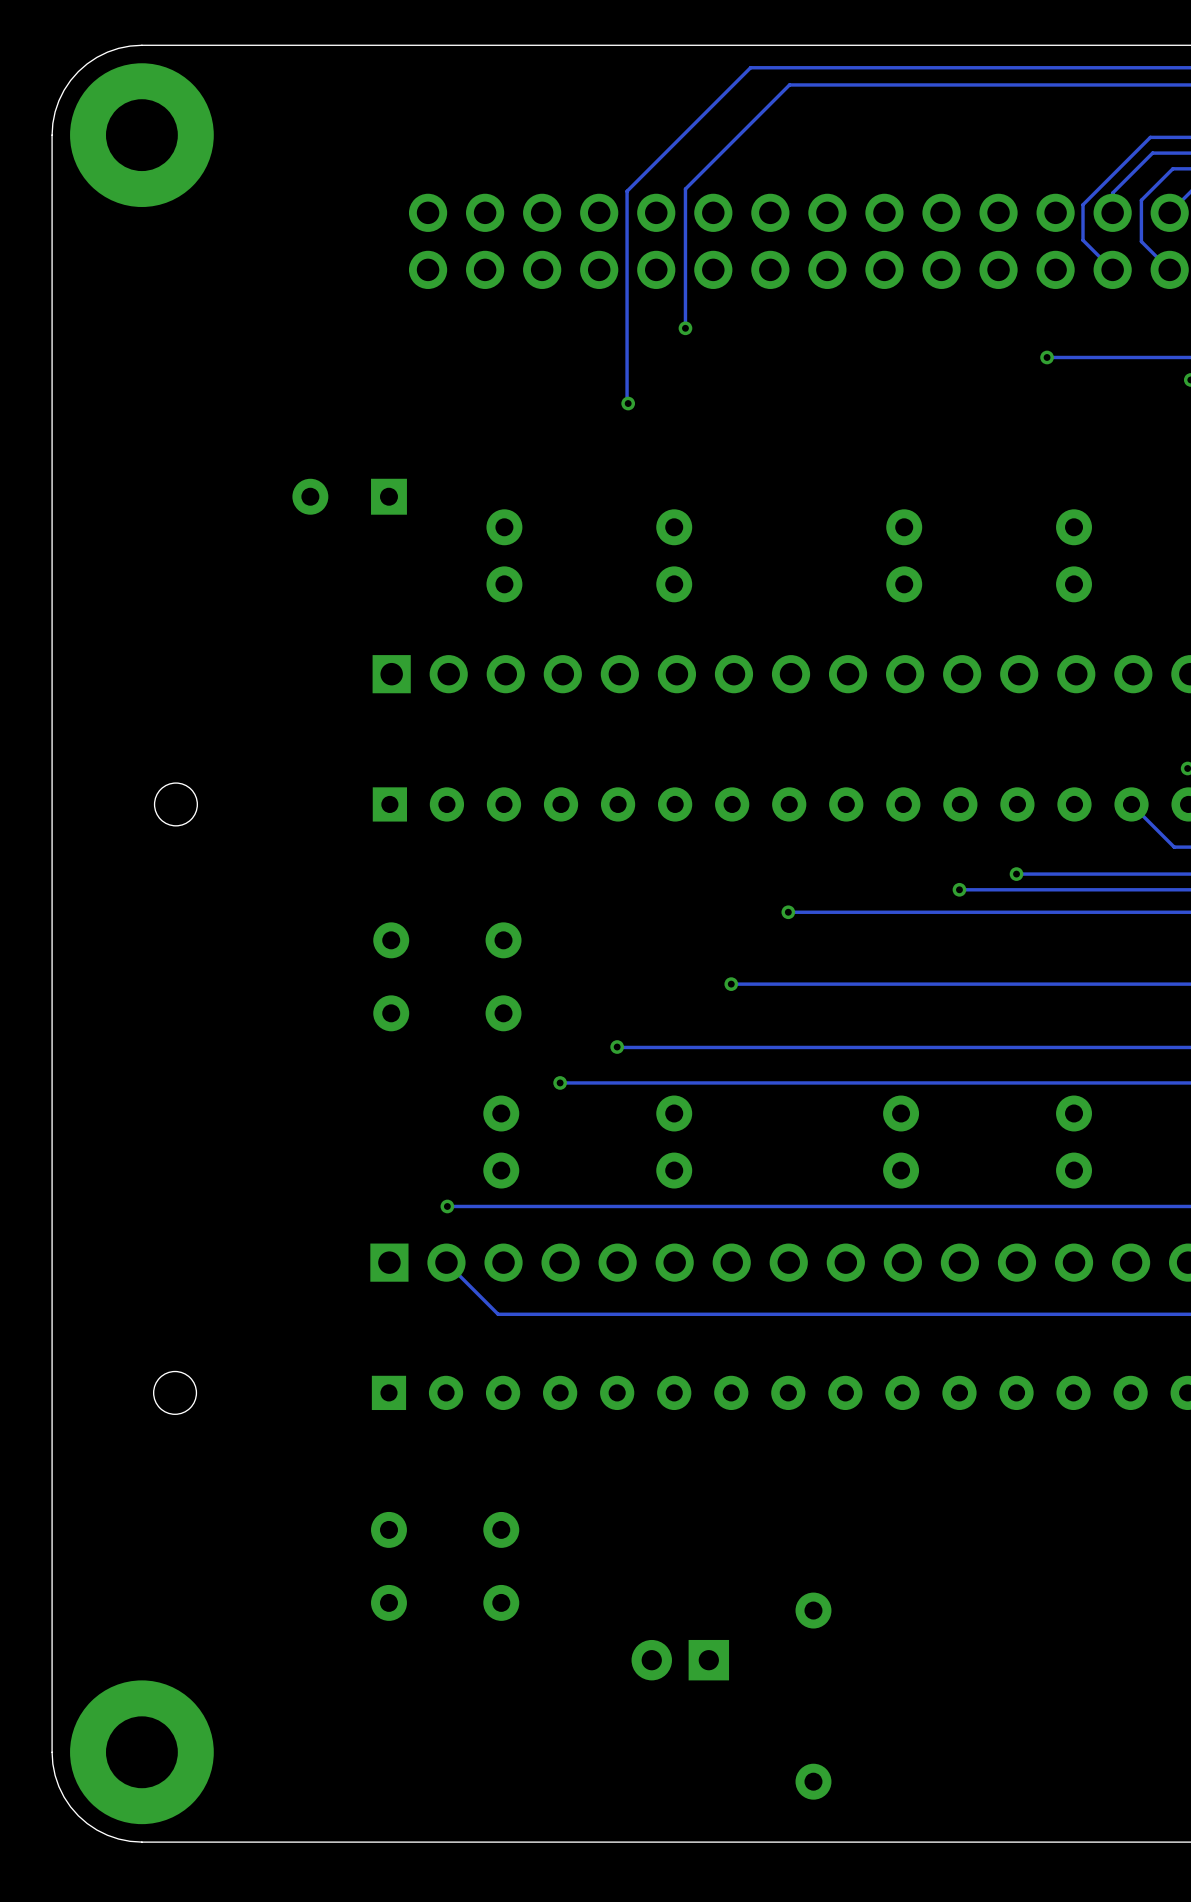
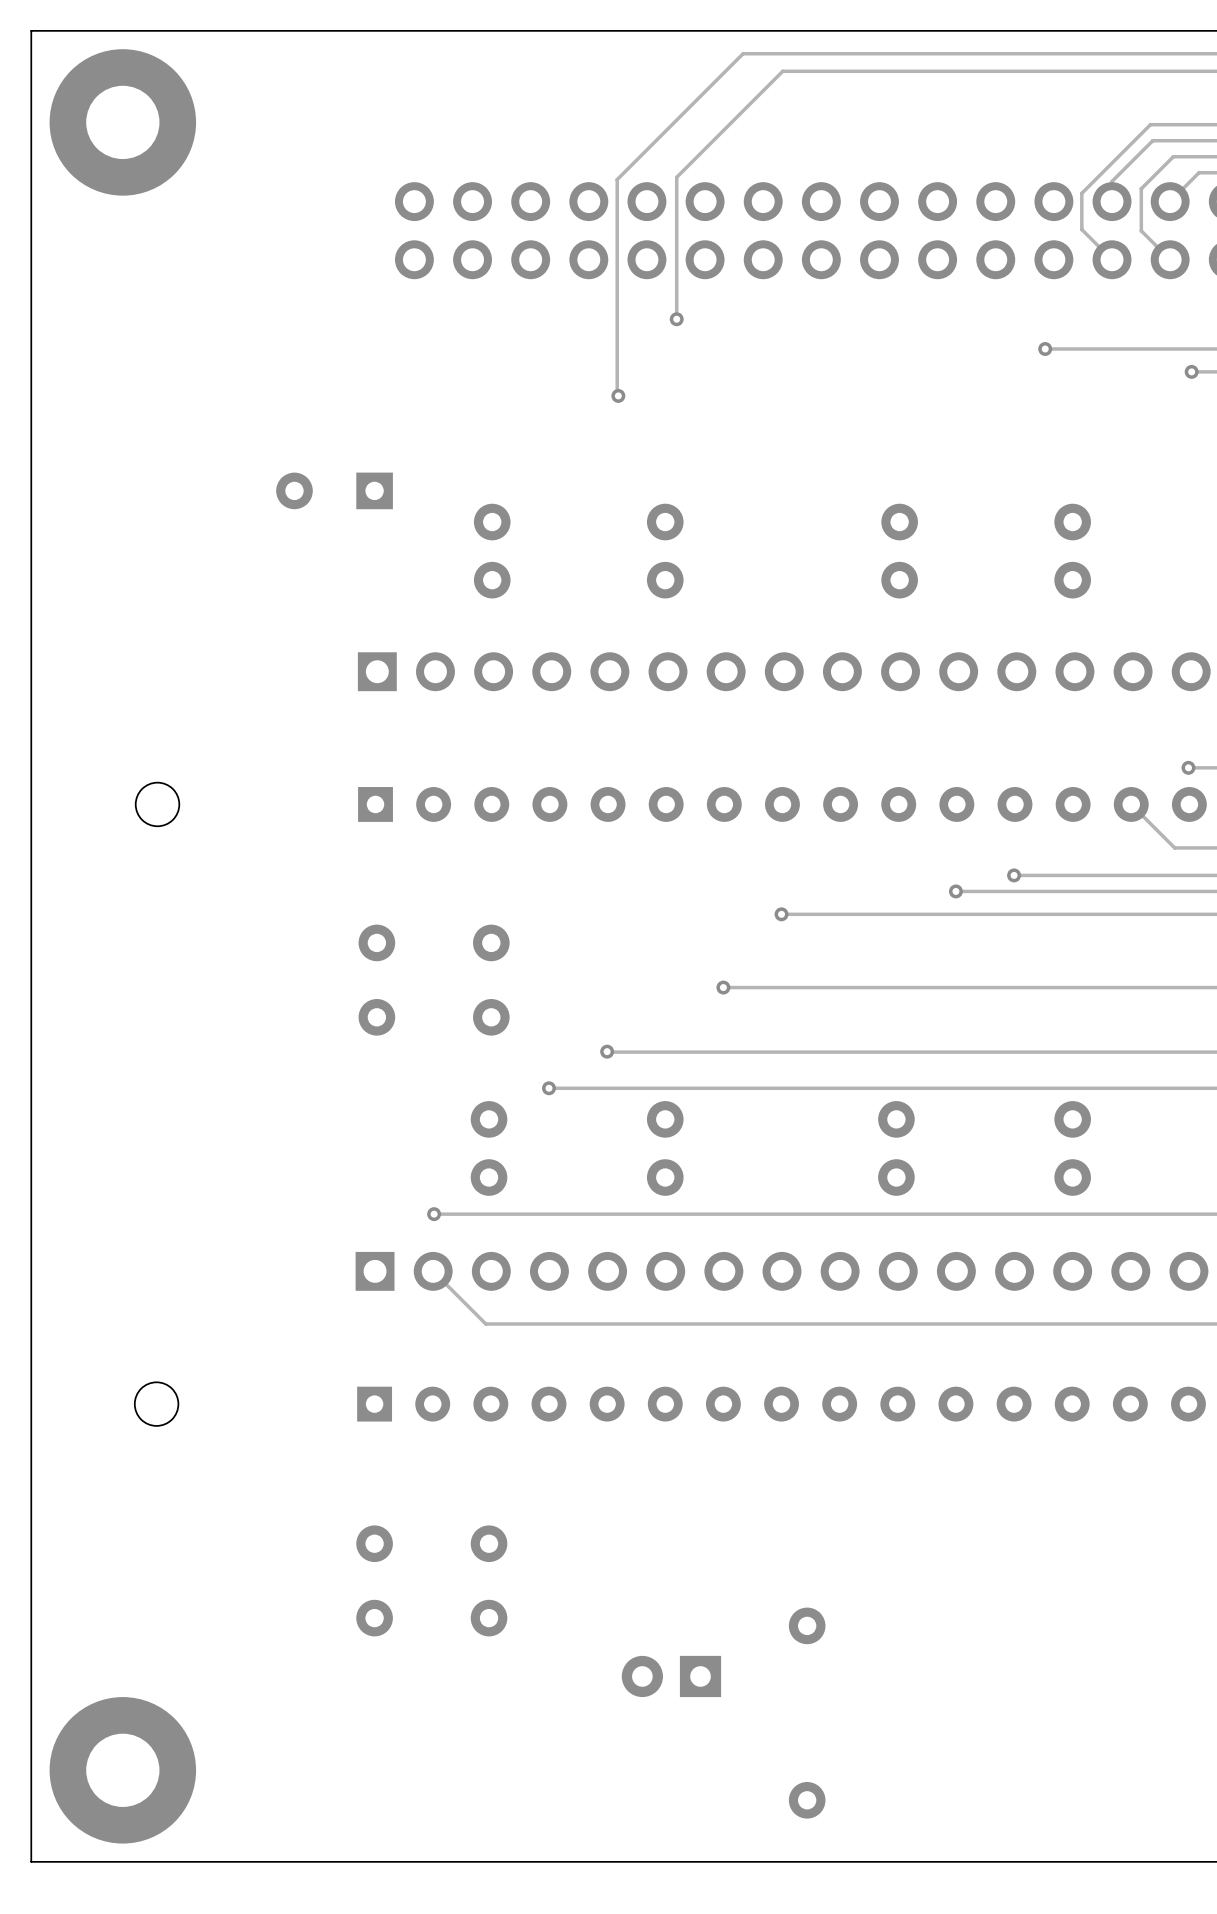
board edge: (141, 45) (118, 48) (107, 52) (96, 57) (78, 71) (70, 80) (58, 100) (52, 123) (52, 135) -> (122, 30) (31, 30) (31, 122)
board edge: (52, 1752) (55, 1775) (58, 1786) (64, 1797) (78, 1815) (87, 1823) (107, 1835) (130, 1841) (141, 1842) -> (31, 1770) (31, 1861) (122, 1861)

